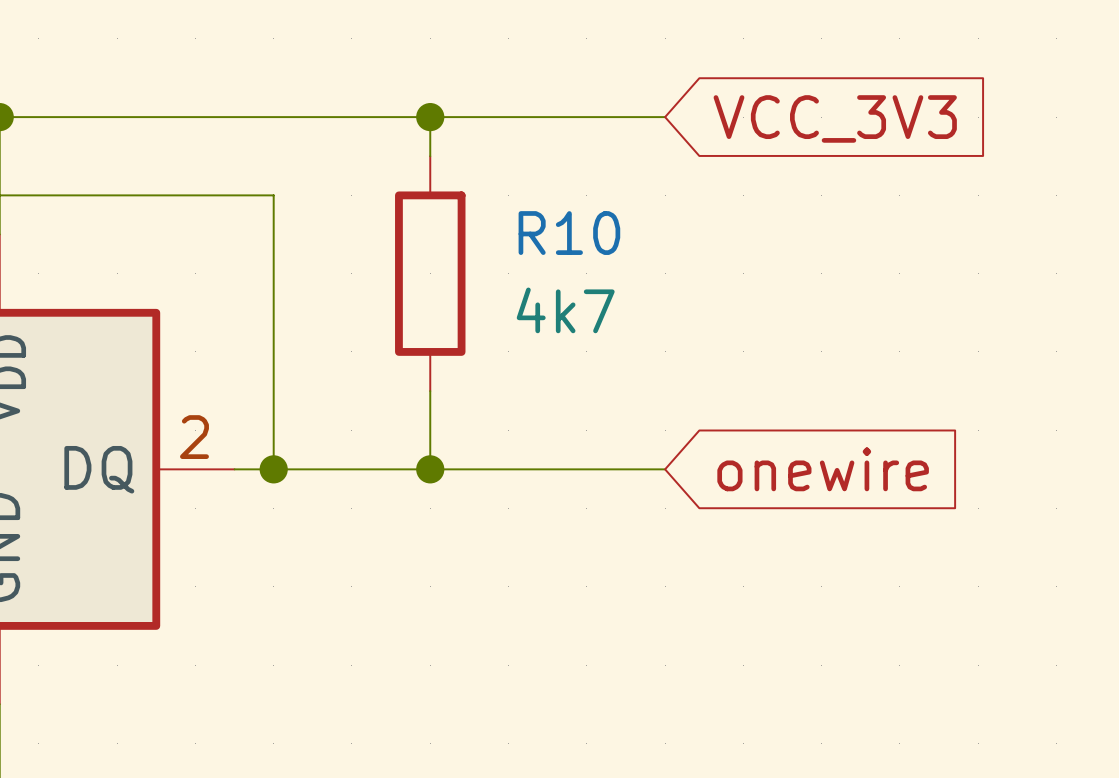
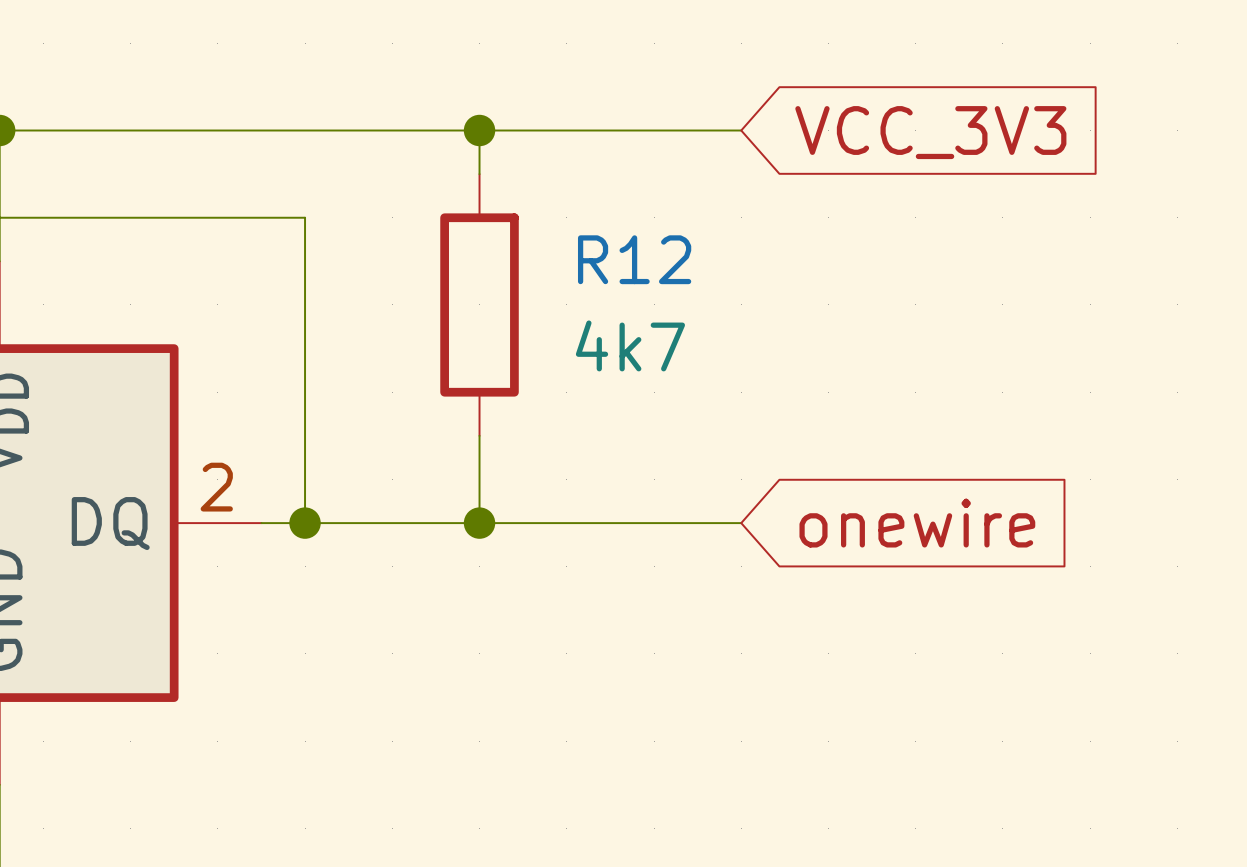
R10 name: R10 (569, 233) -> R12 (634, 259)

